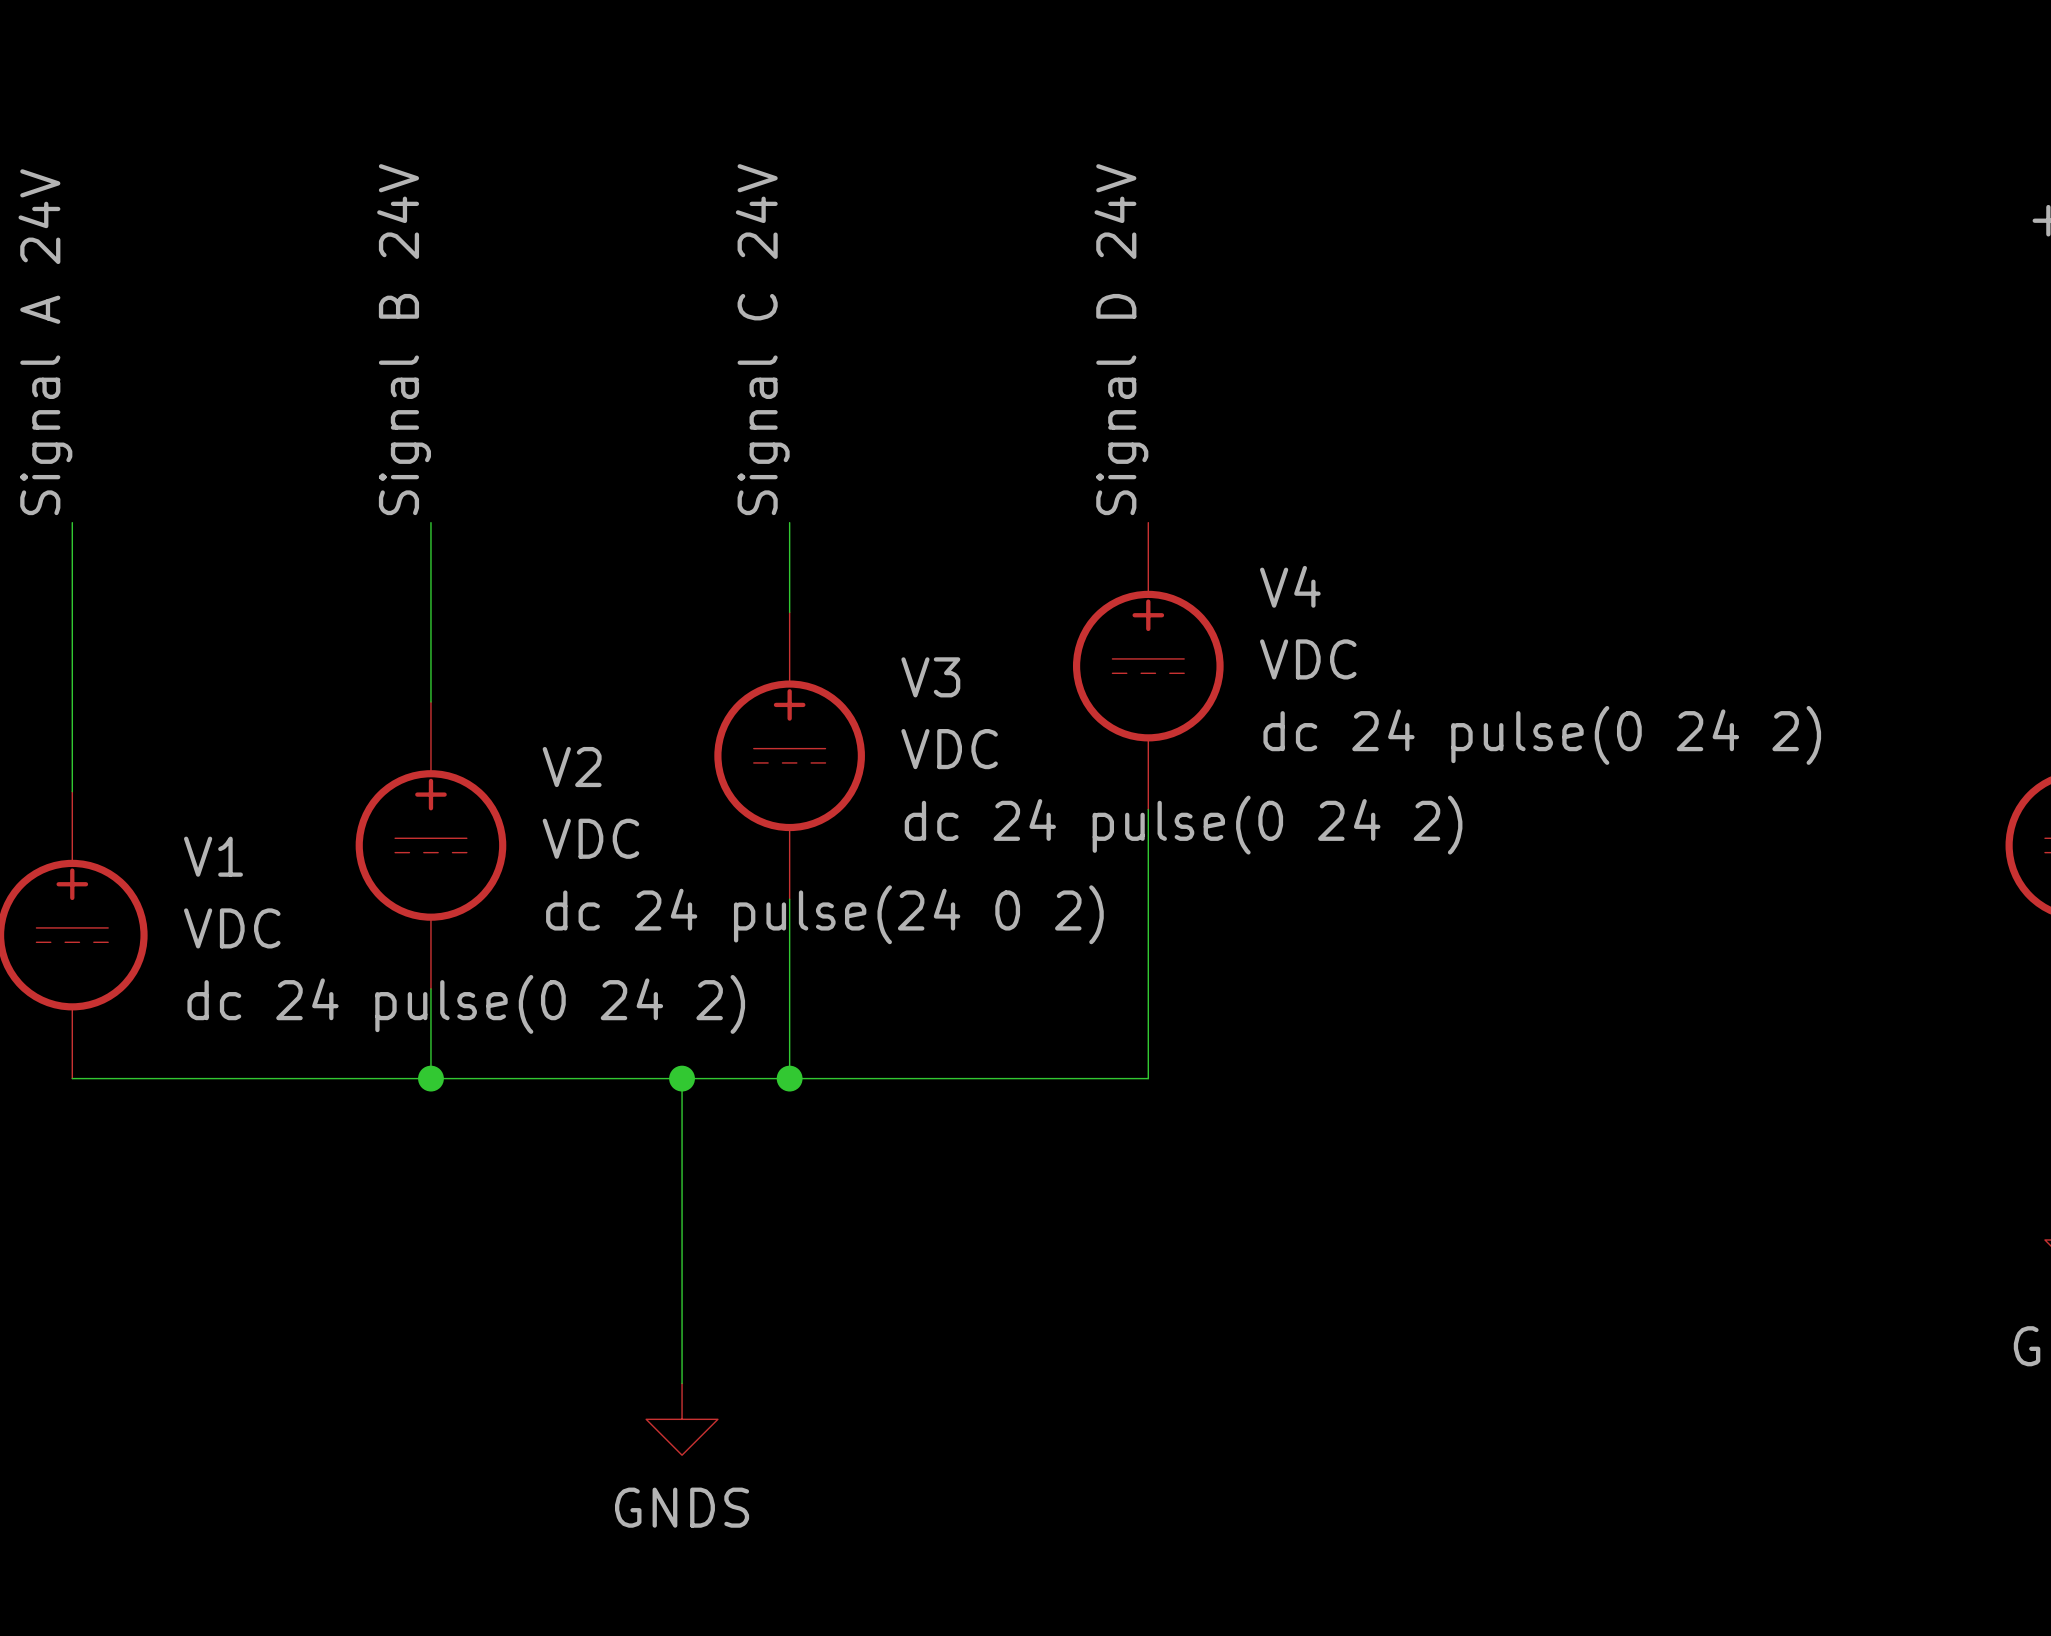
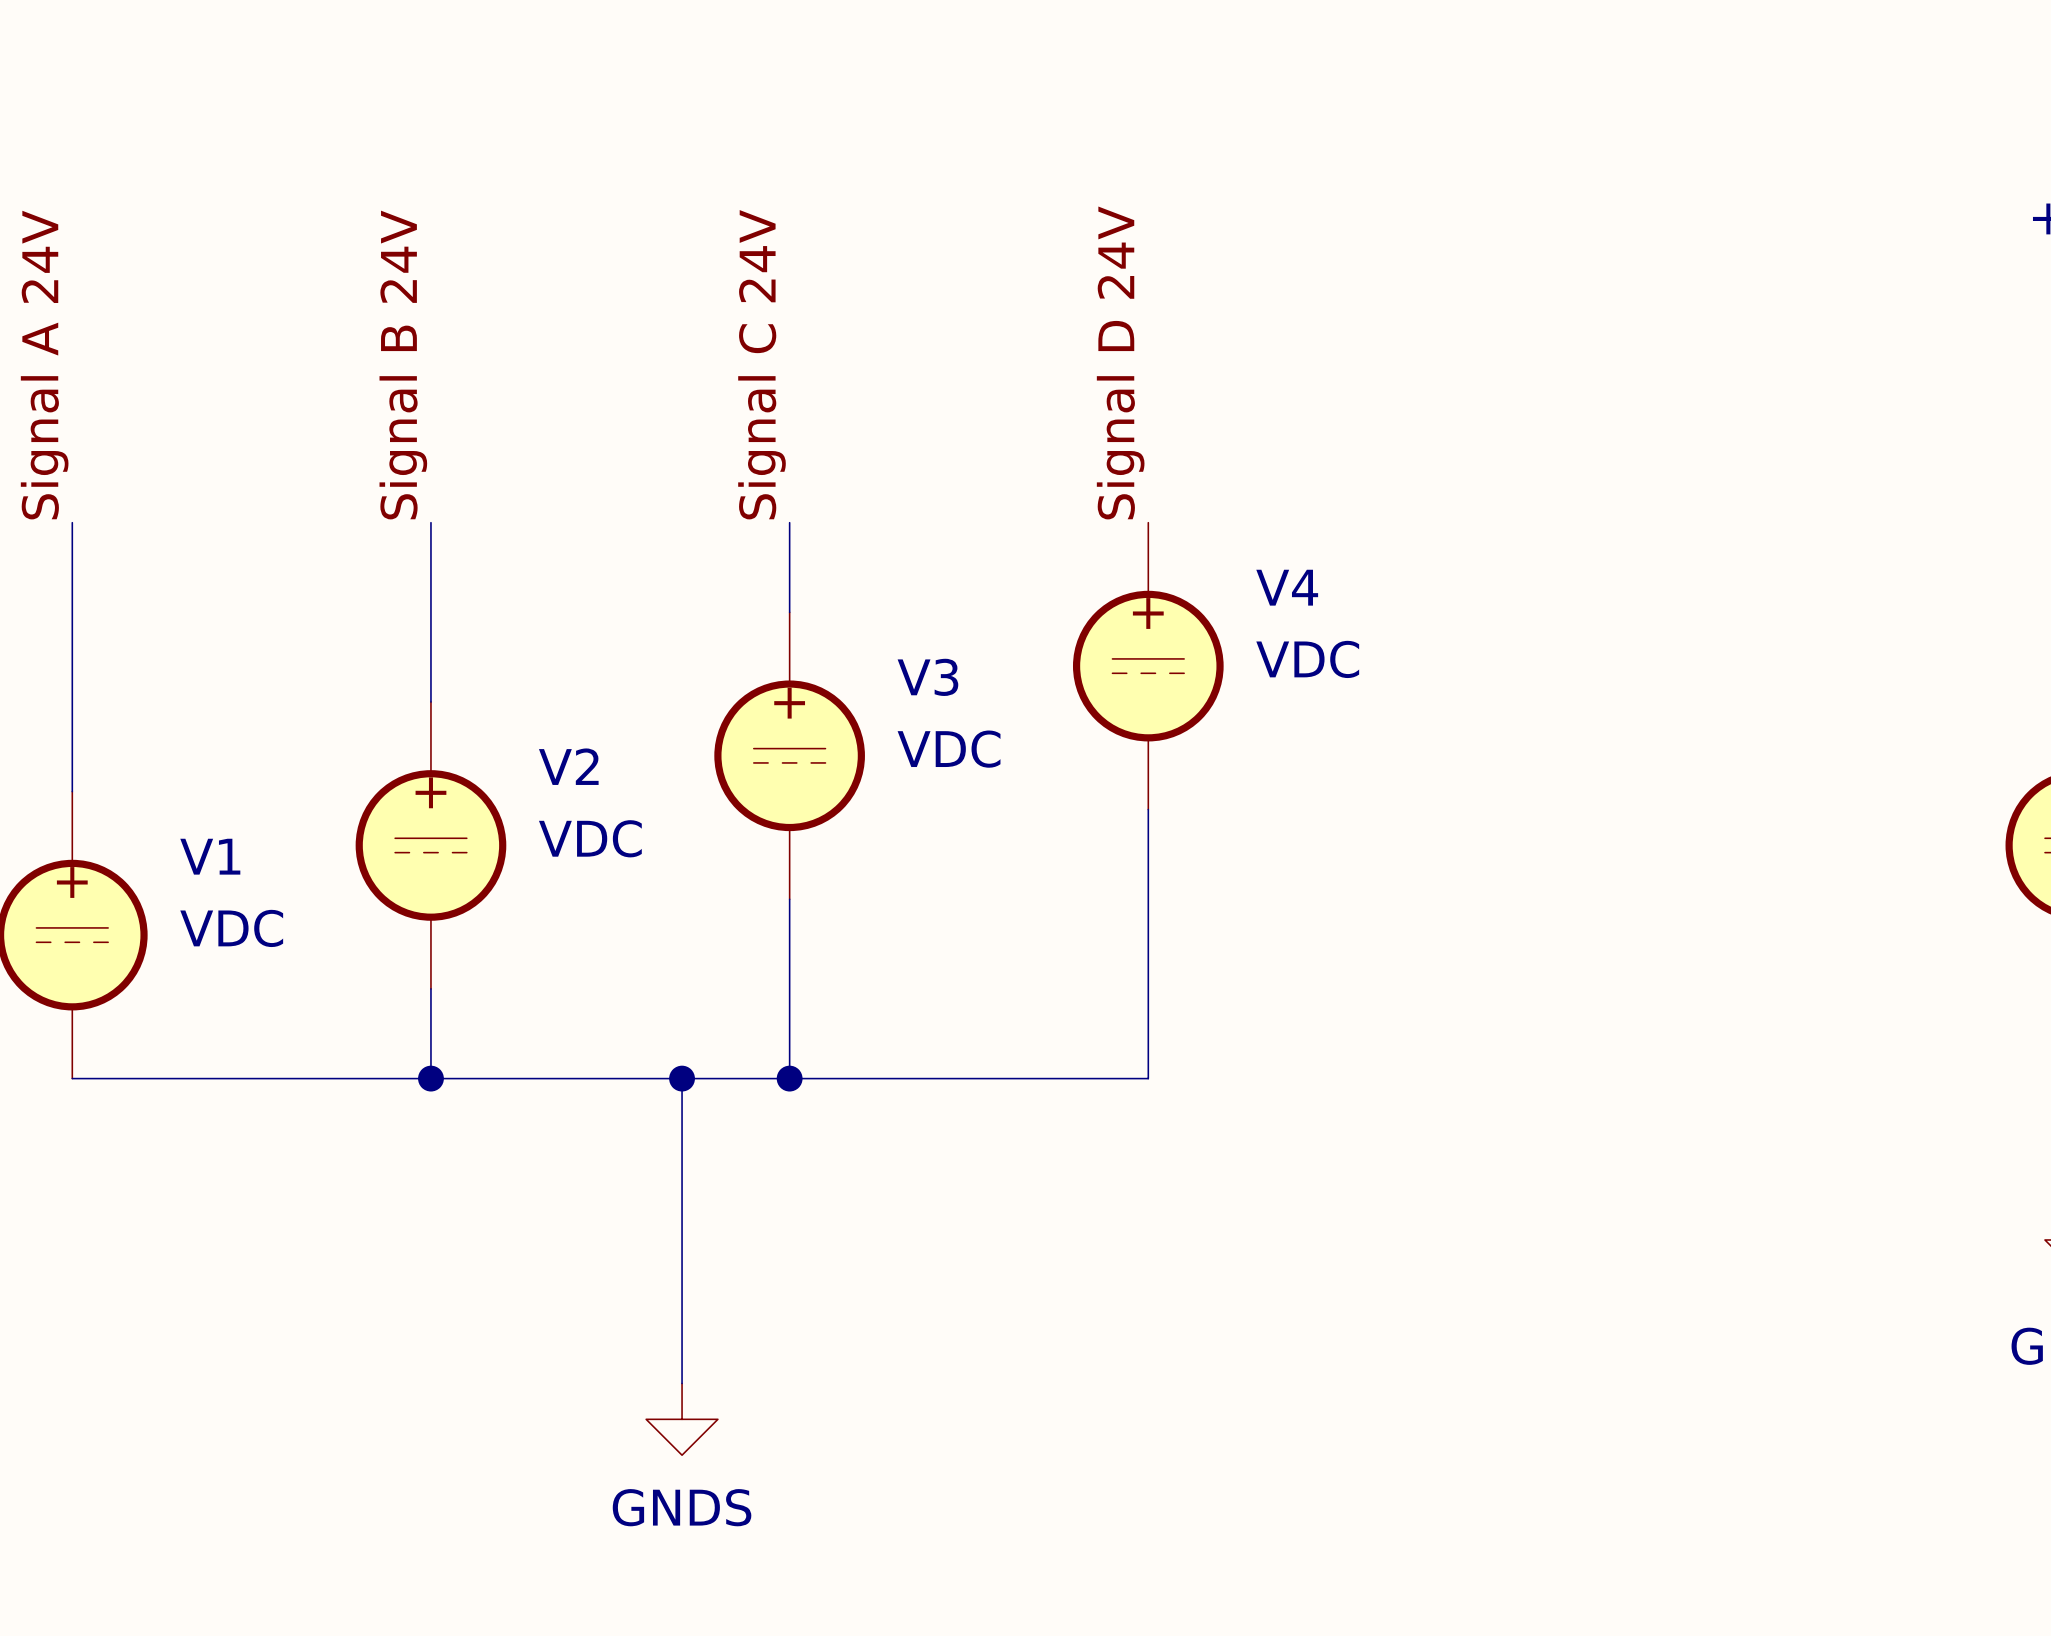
V4 text: dc 24 pulse(0 24 2) (1542, 735) -> none
V3 text: dc 24 pulse(0 24 2) (1183, 825) -> none
V2 text: dc 24 pulse(24 0 2) (824, 914) -> none
V1 text: dc 24 pulse(0 24 2) (466, 1004) -> none

